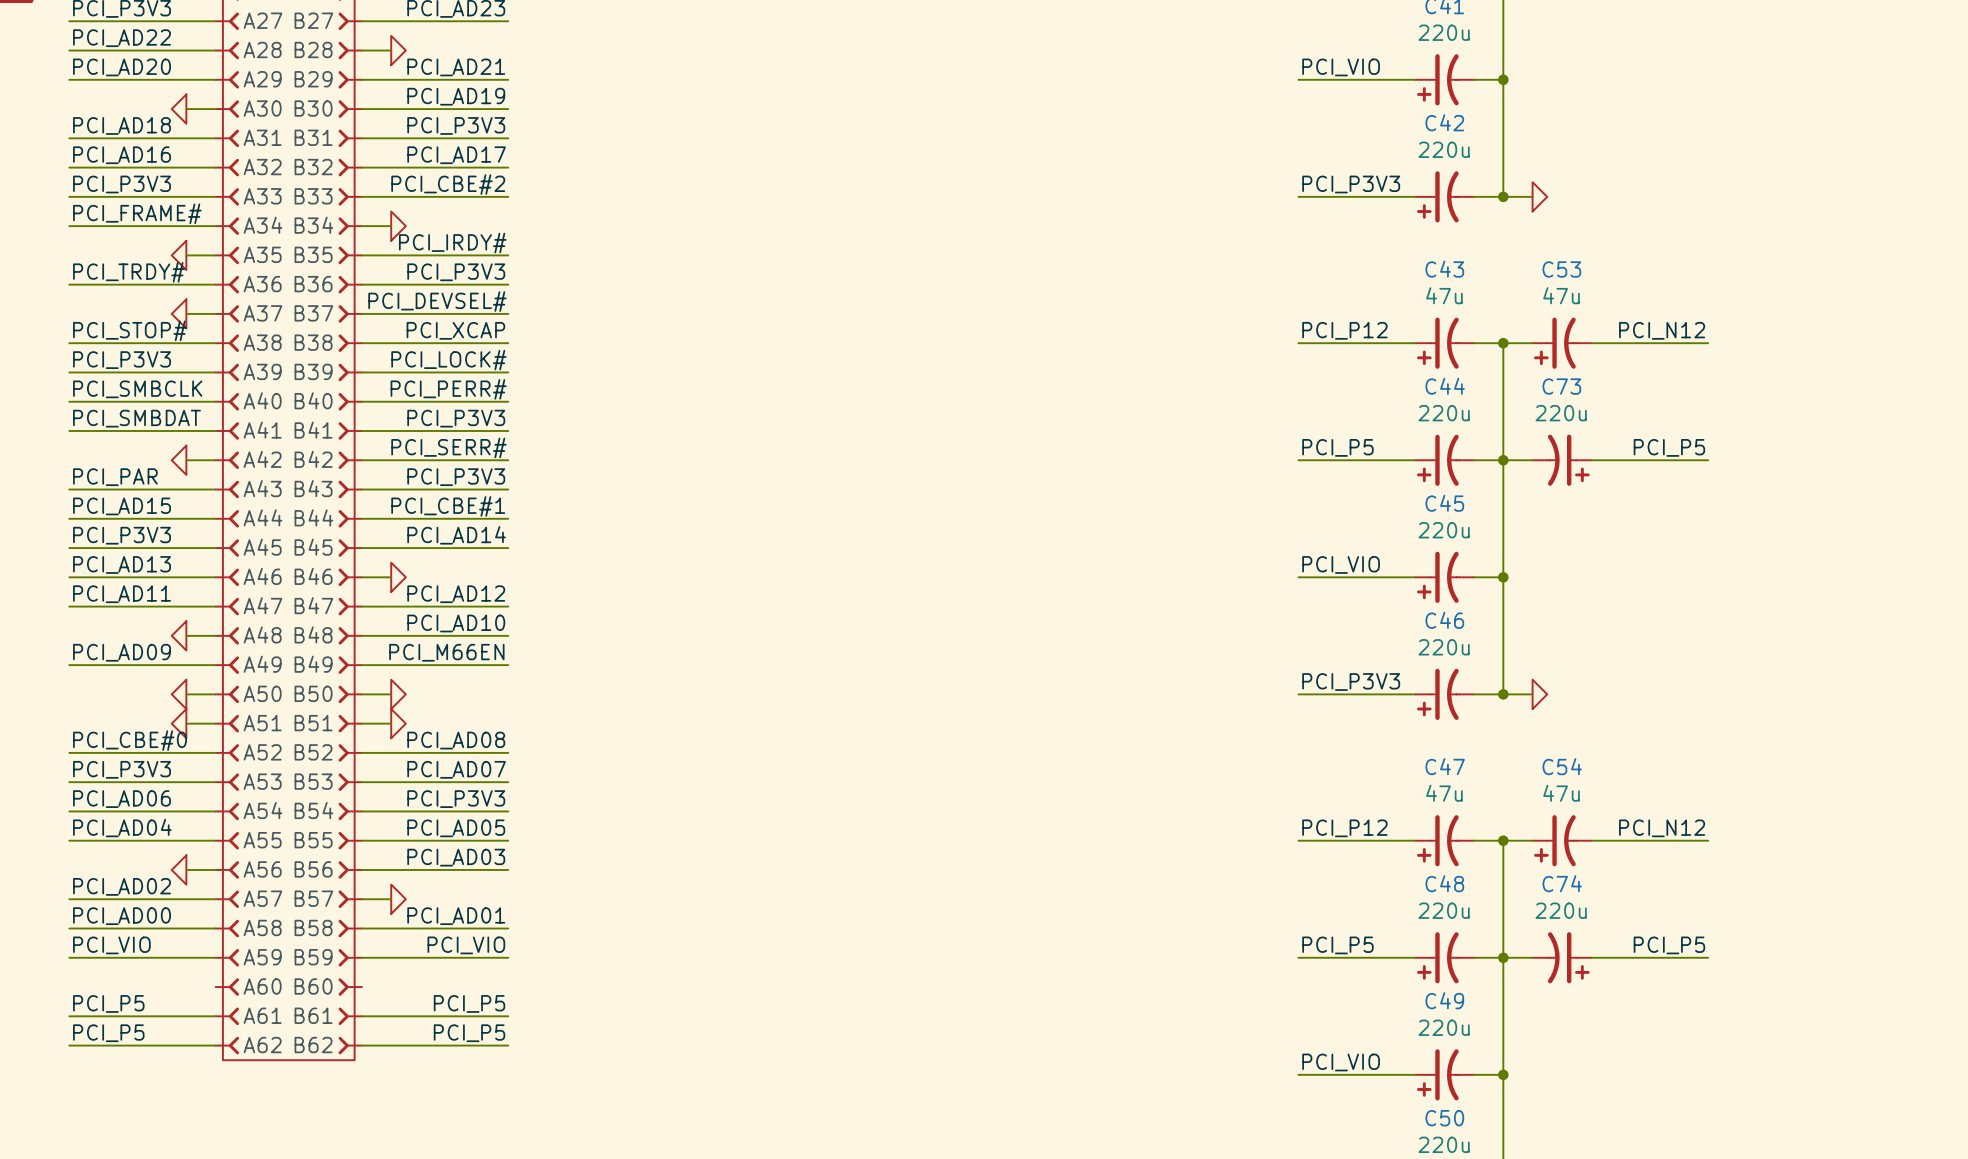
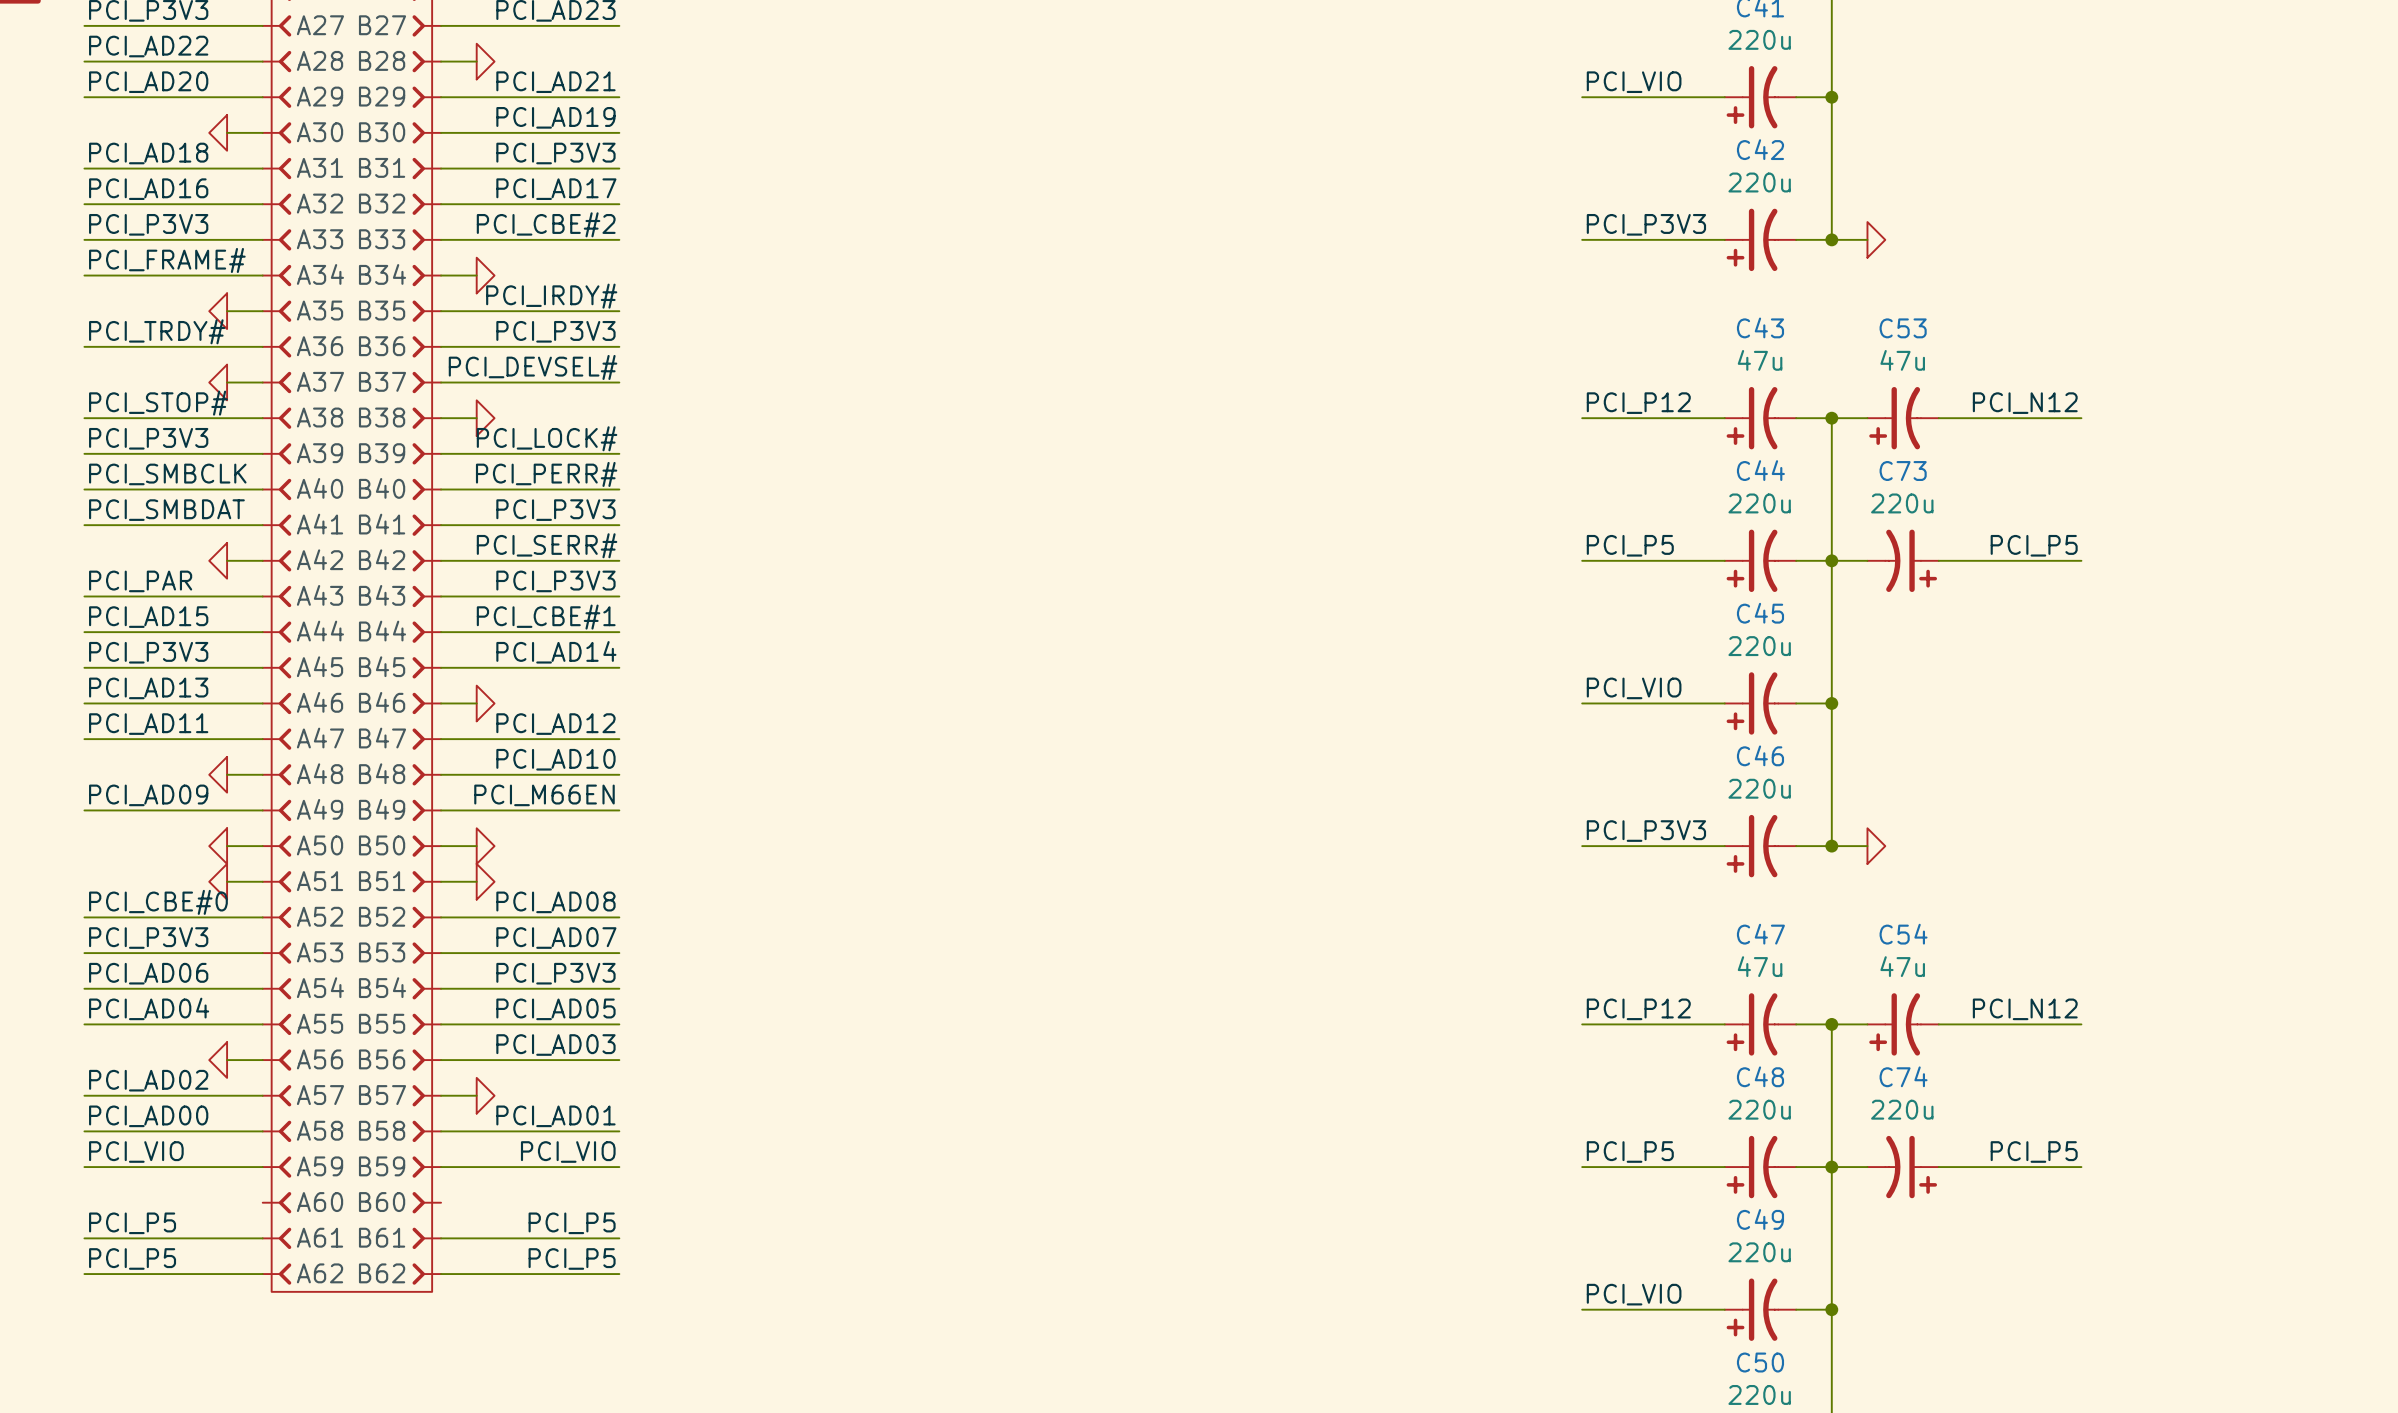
label: PCI_XCAP (455, 330) -> none
wire: (391, 343) (508, 343) -> none
power symbol: none -> (485, 418)

